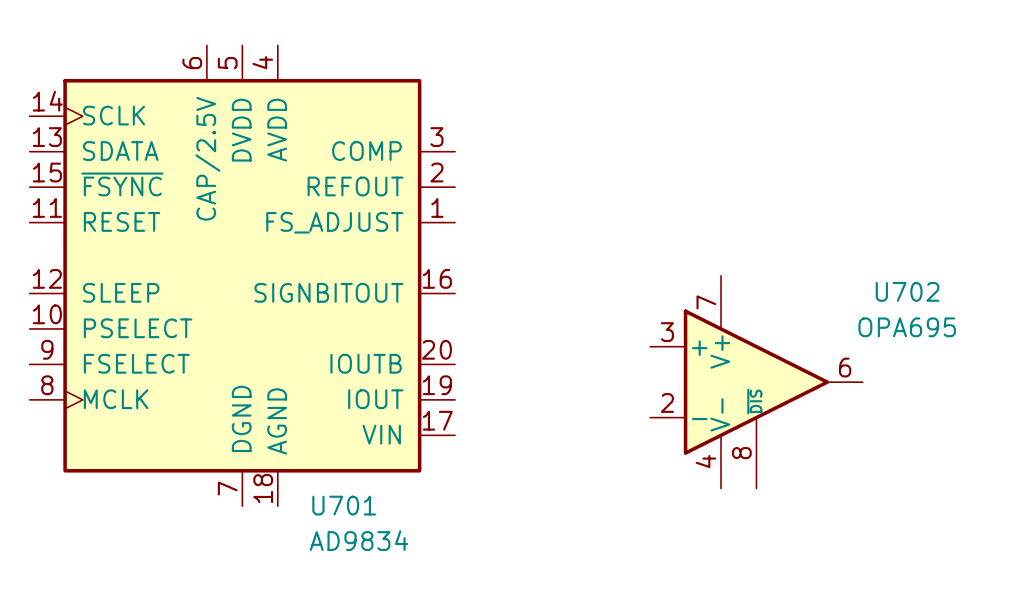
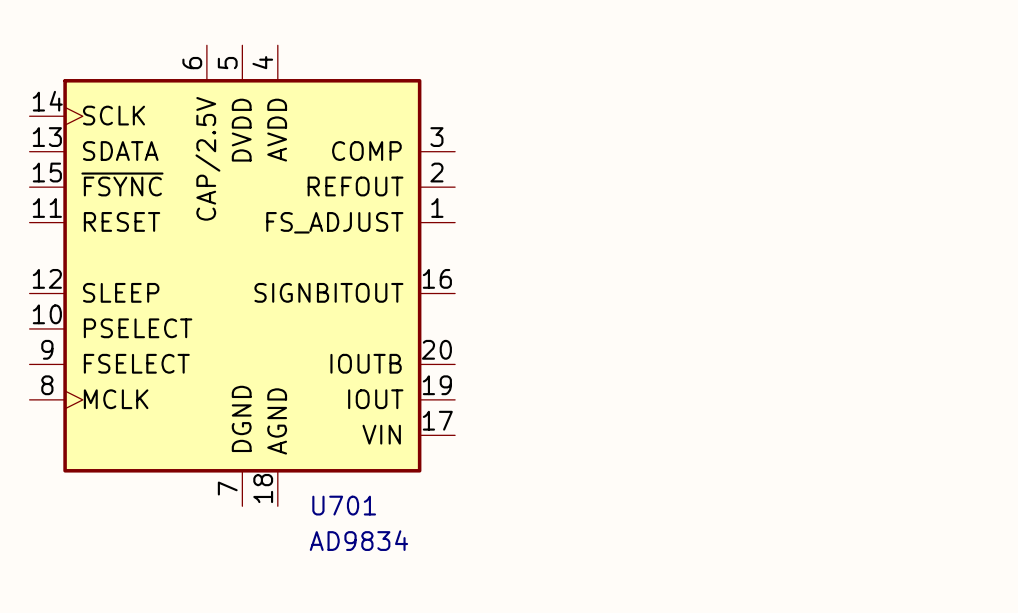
U702: OPA695 (756, 382) -> none

